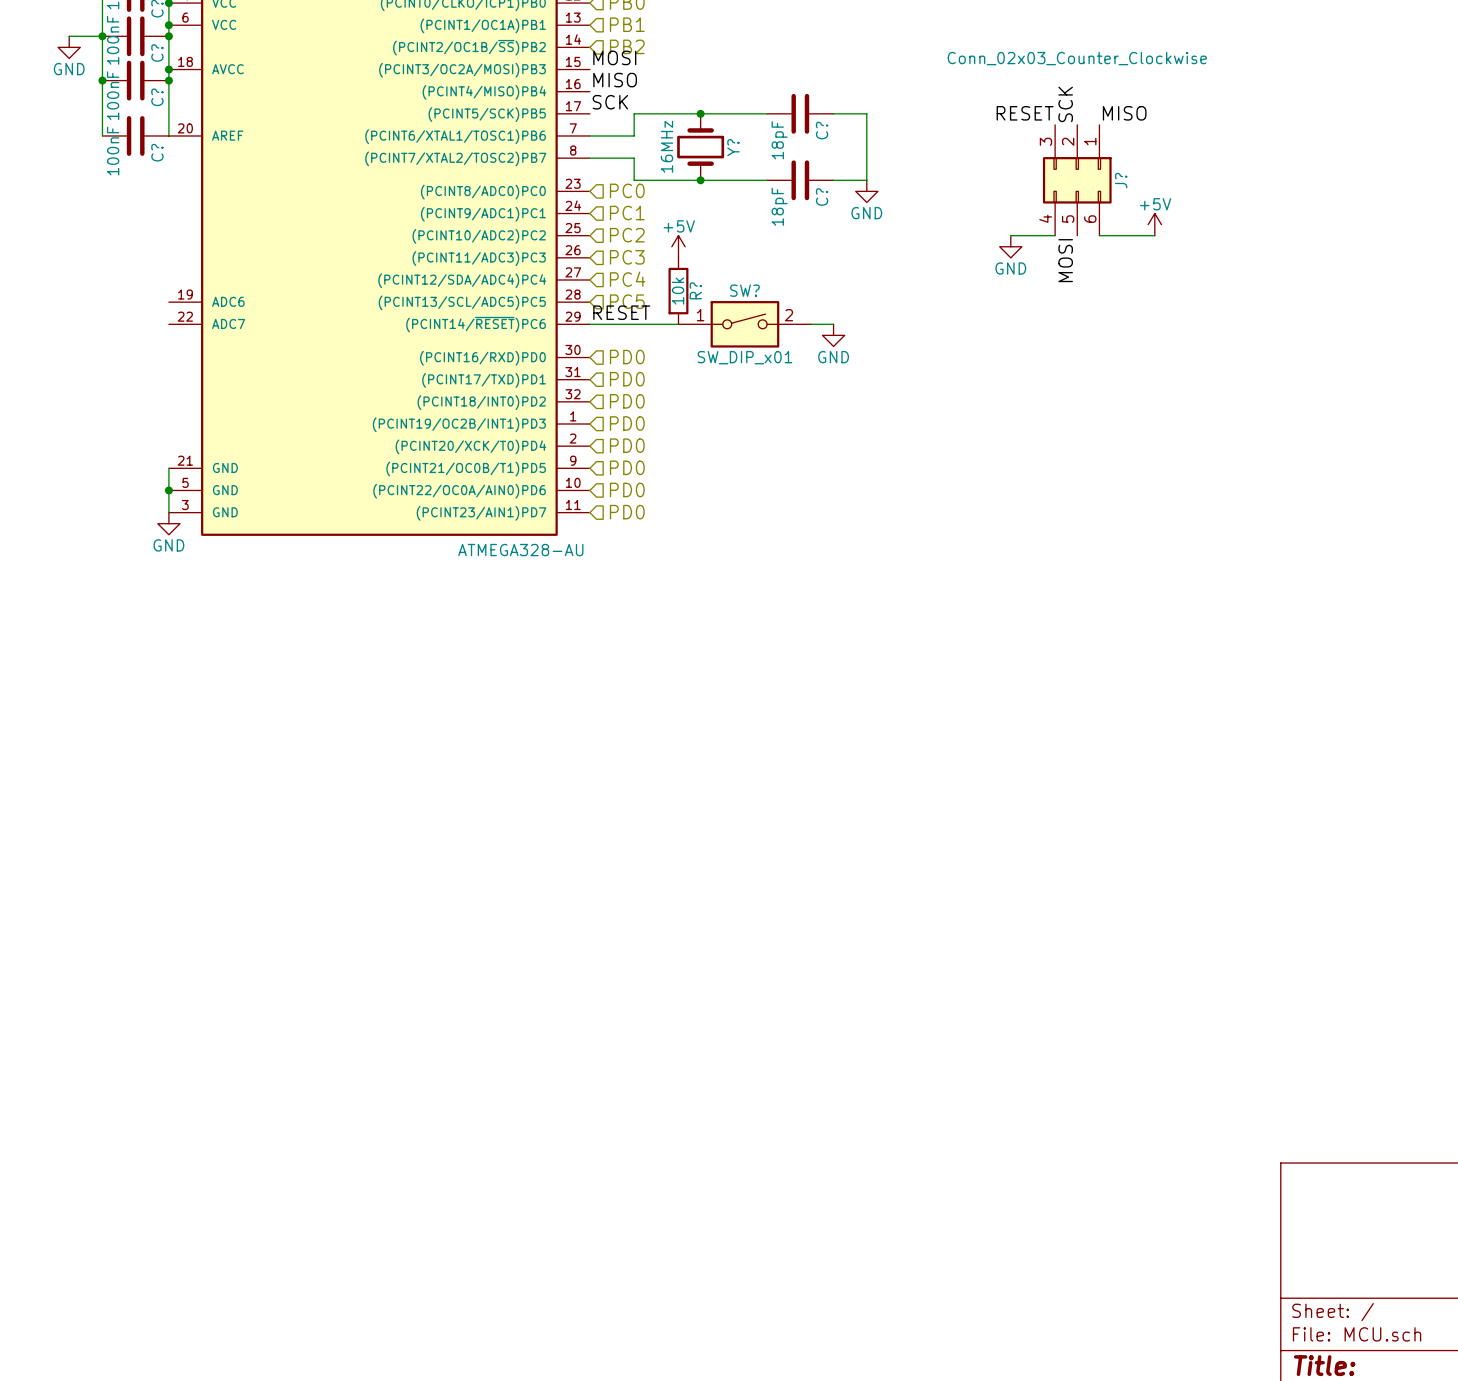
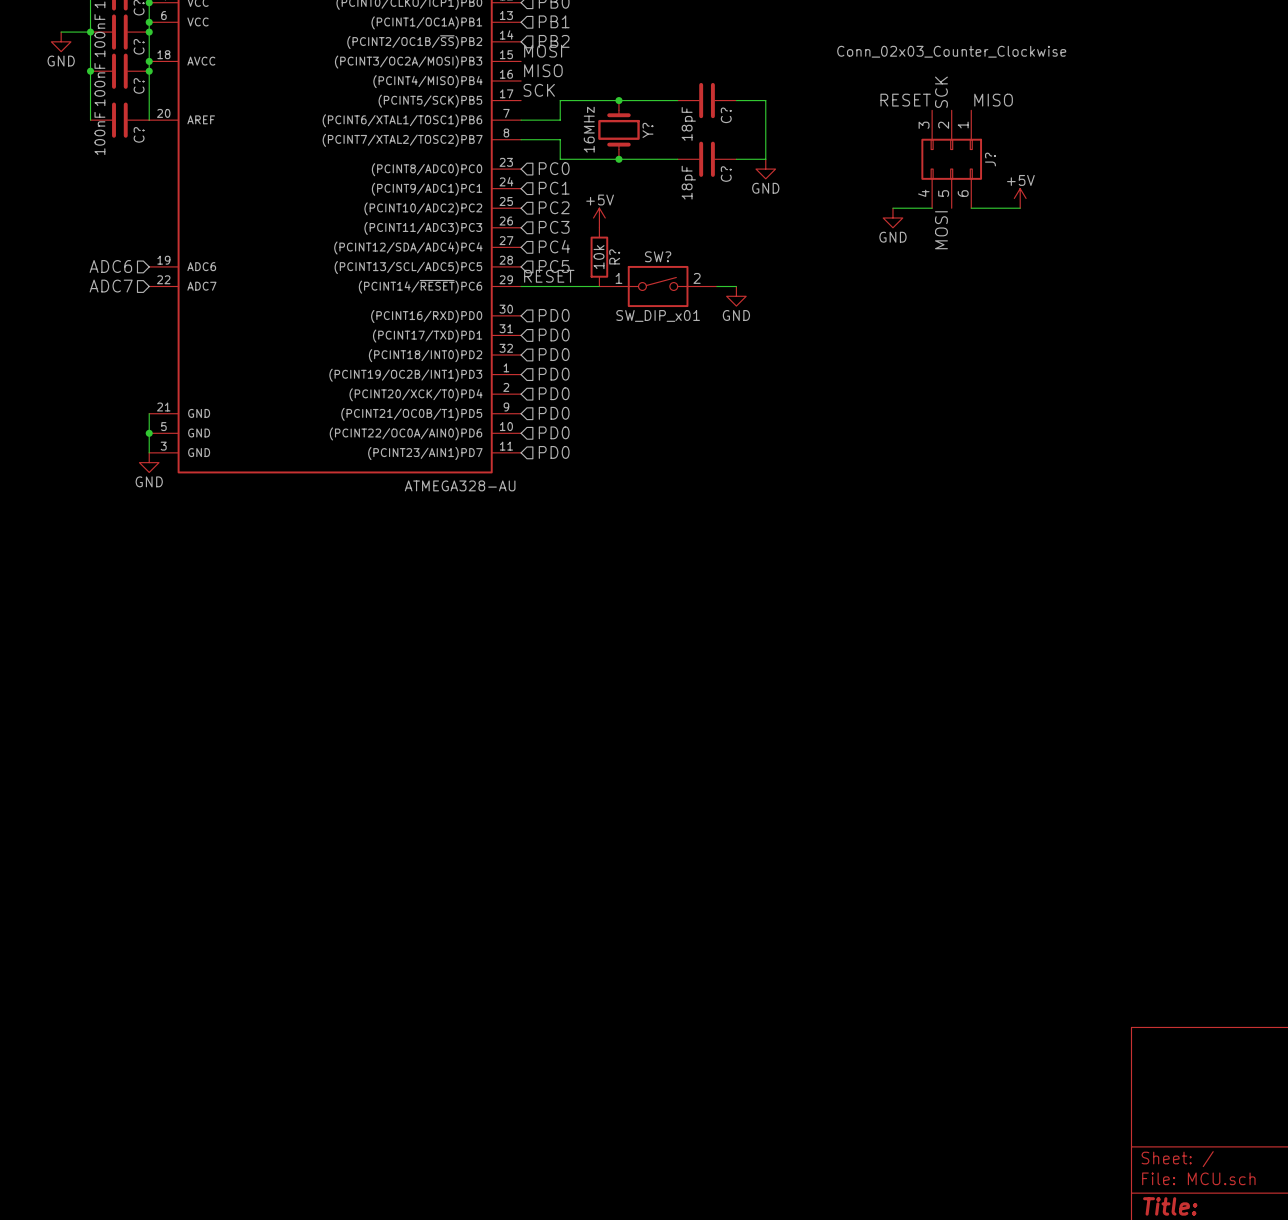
hierarchical label: none -> ADC6 (110, 266)
hierarchical label: none -> ADC7 (111, 286)

